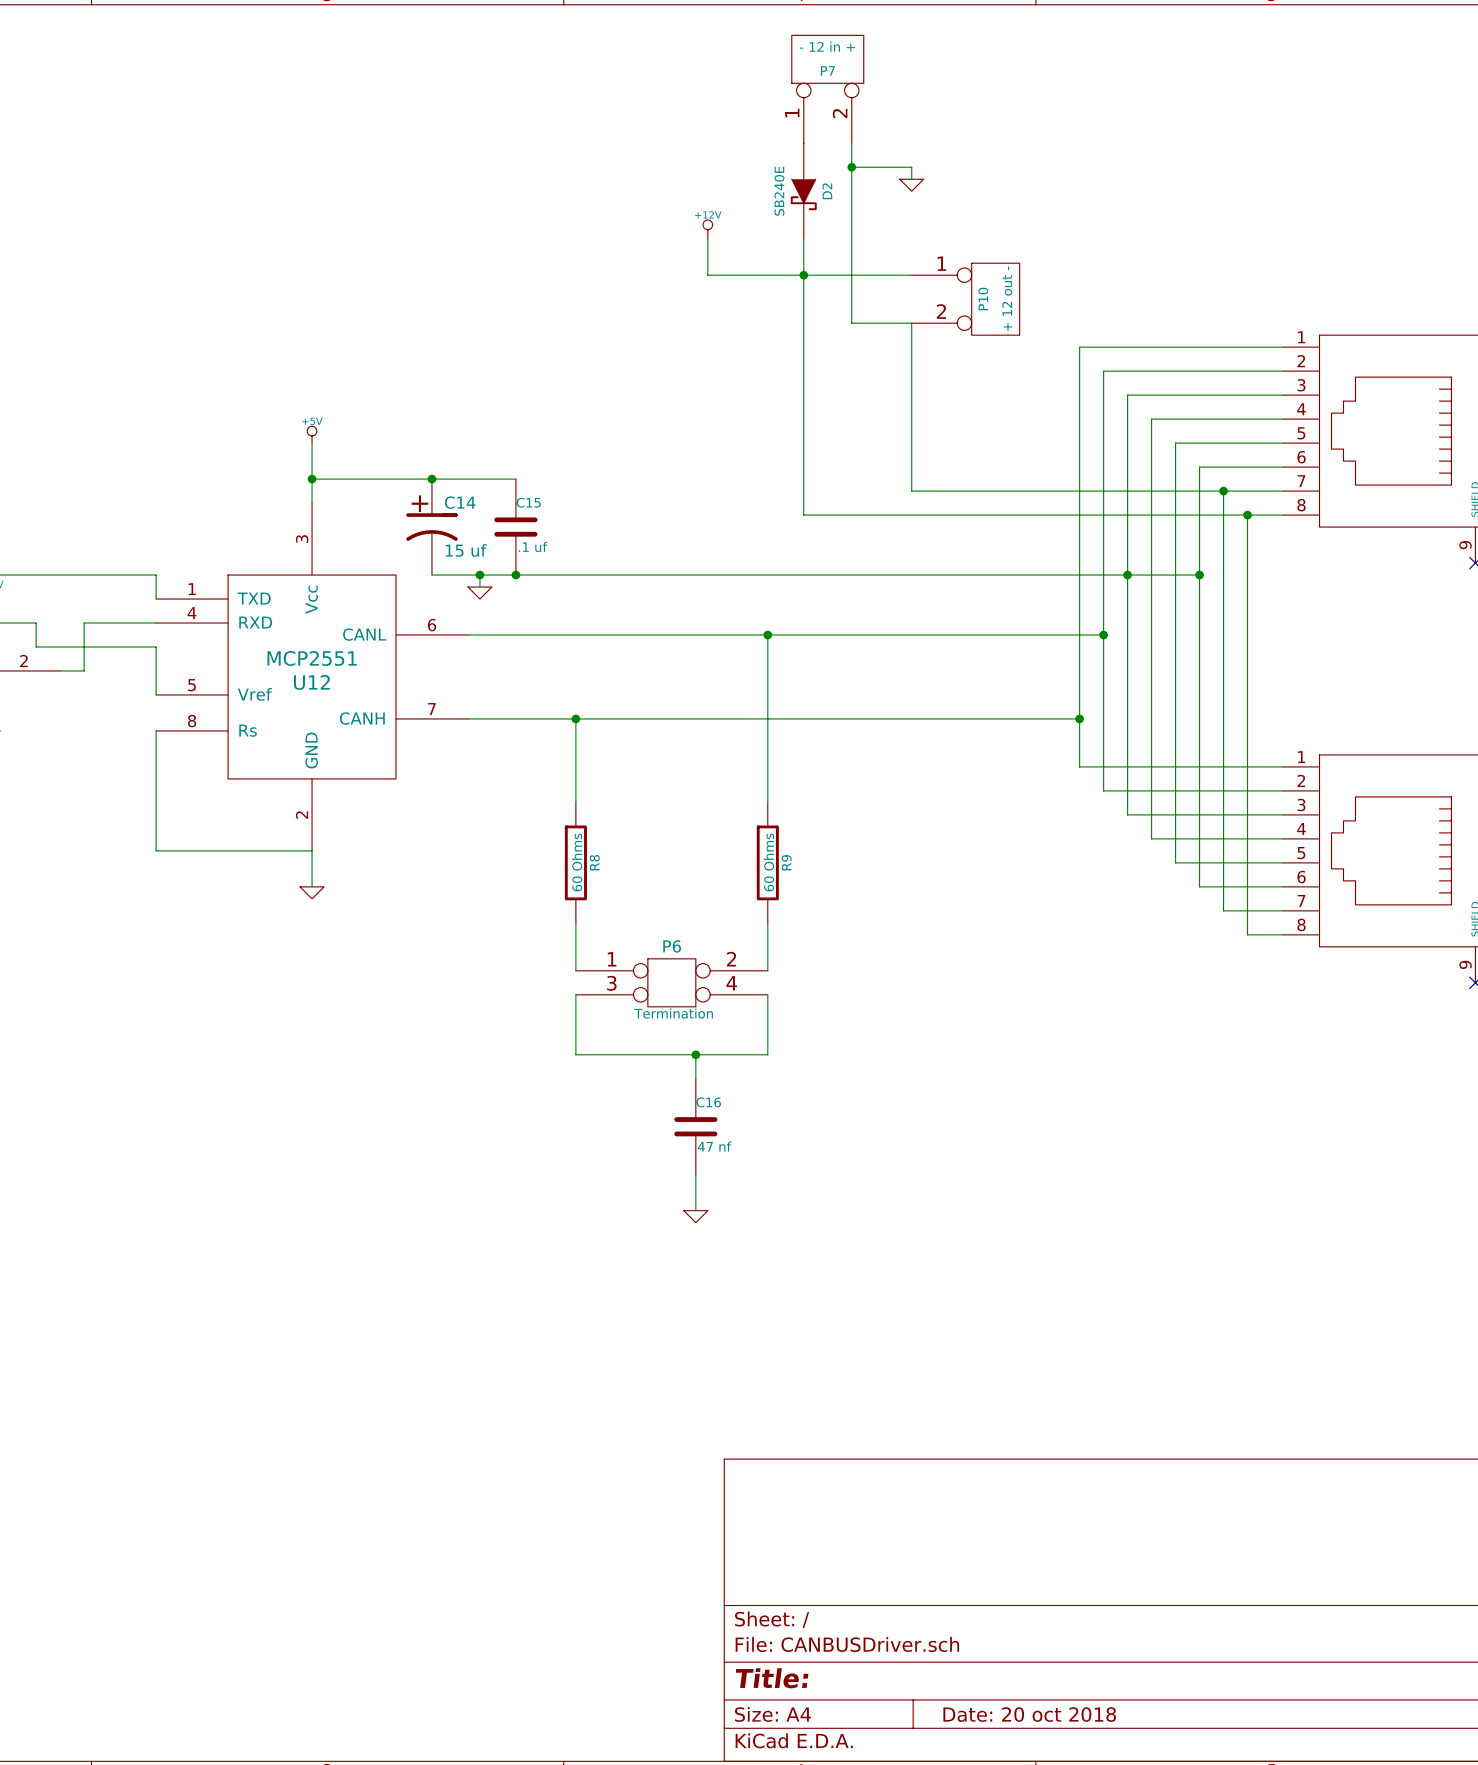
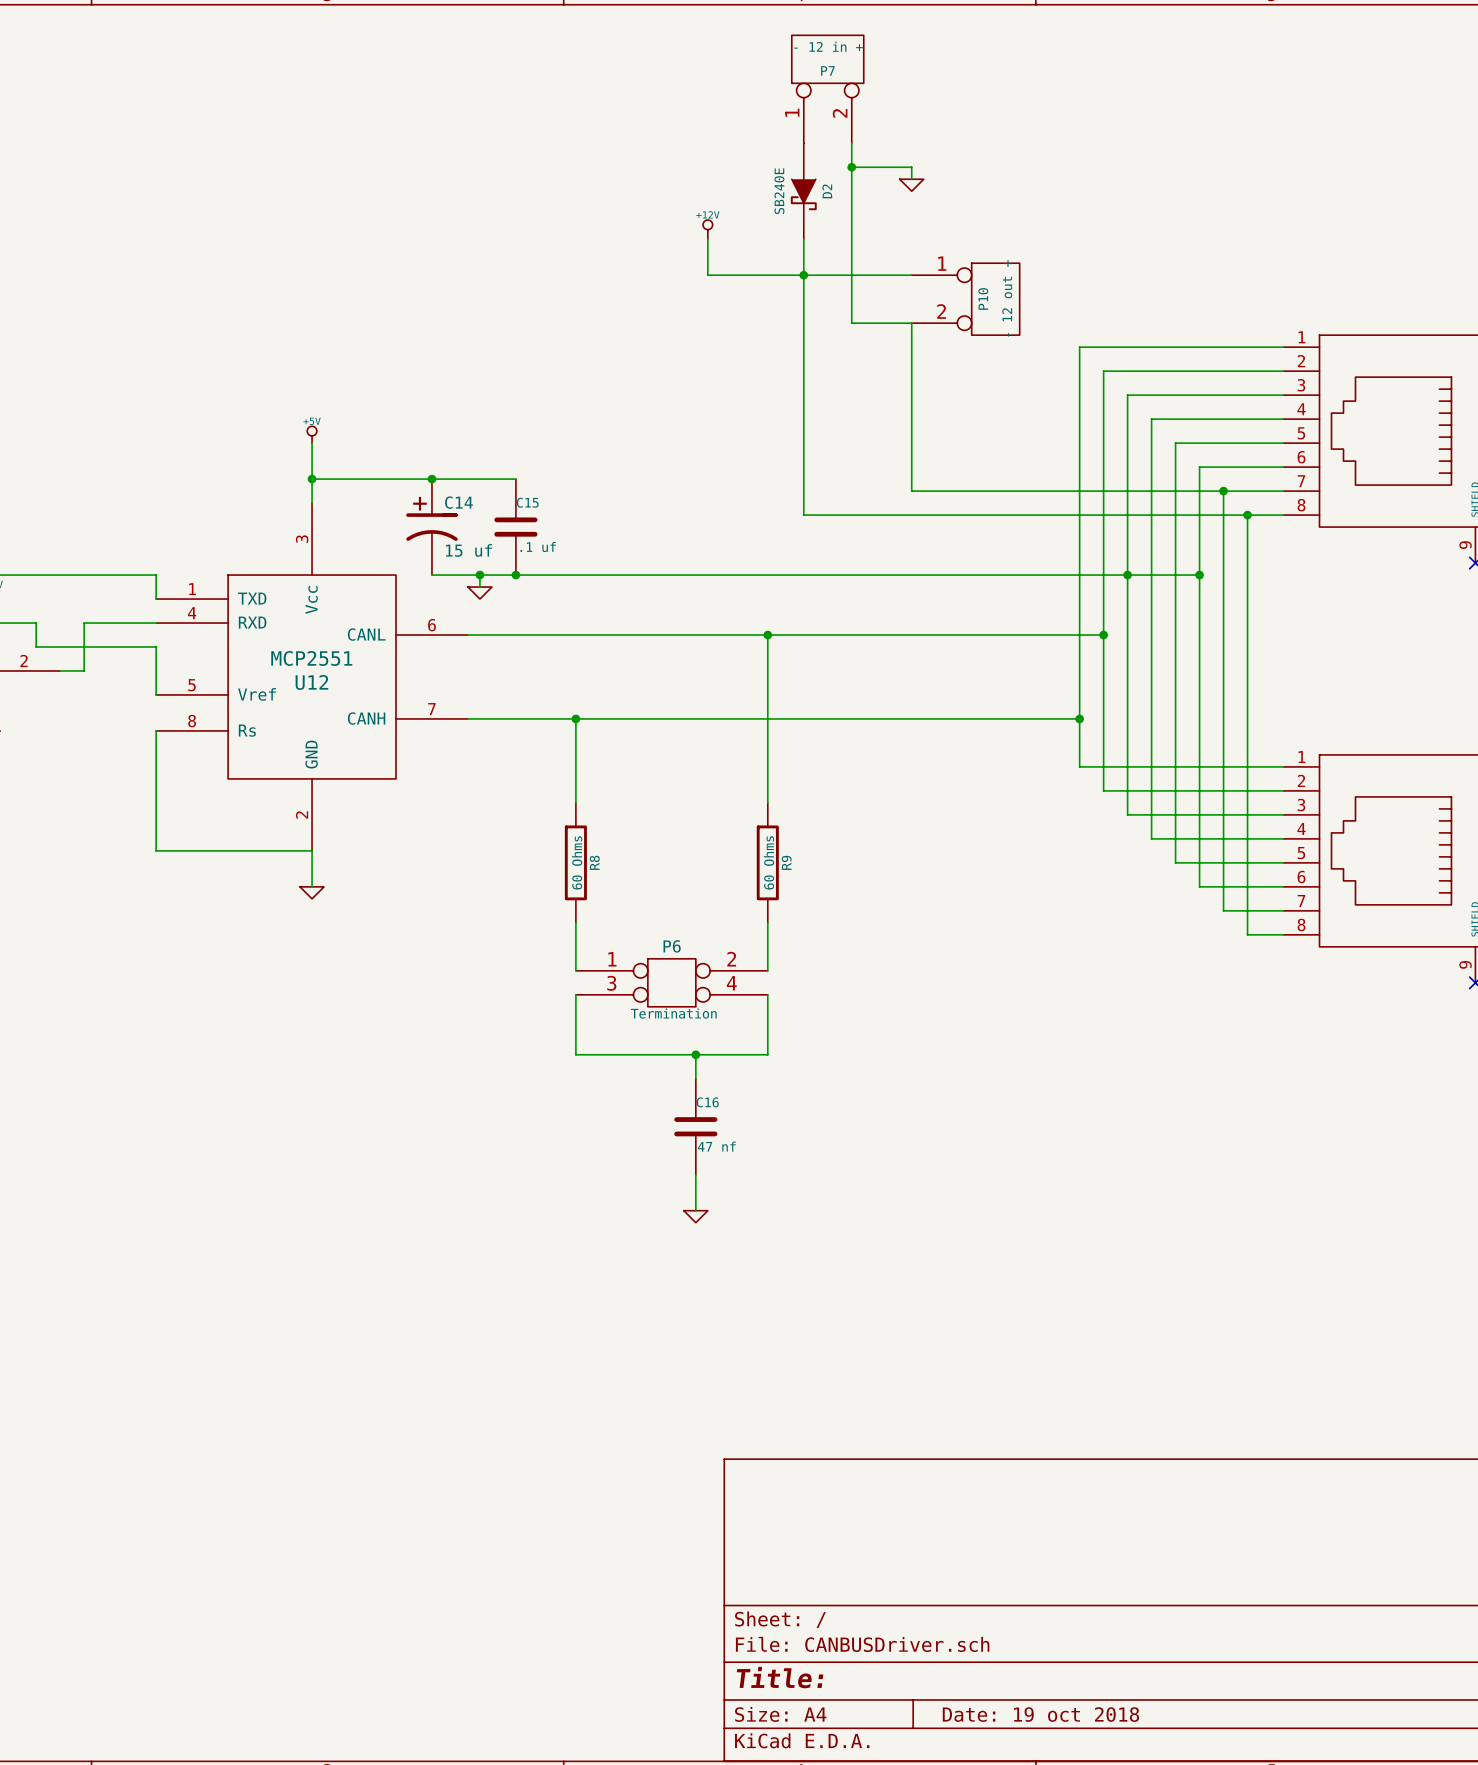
P10 value: + 12 out - (1007, 298) -> - 12 out + (1007, 298)
title block: Date: 20 oct 2018 (1029, 1714) -> Date: 19 oct 2018 (1040, 1714)

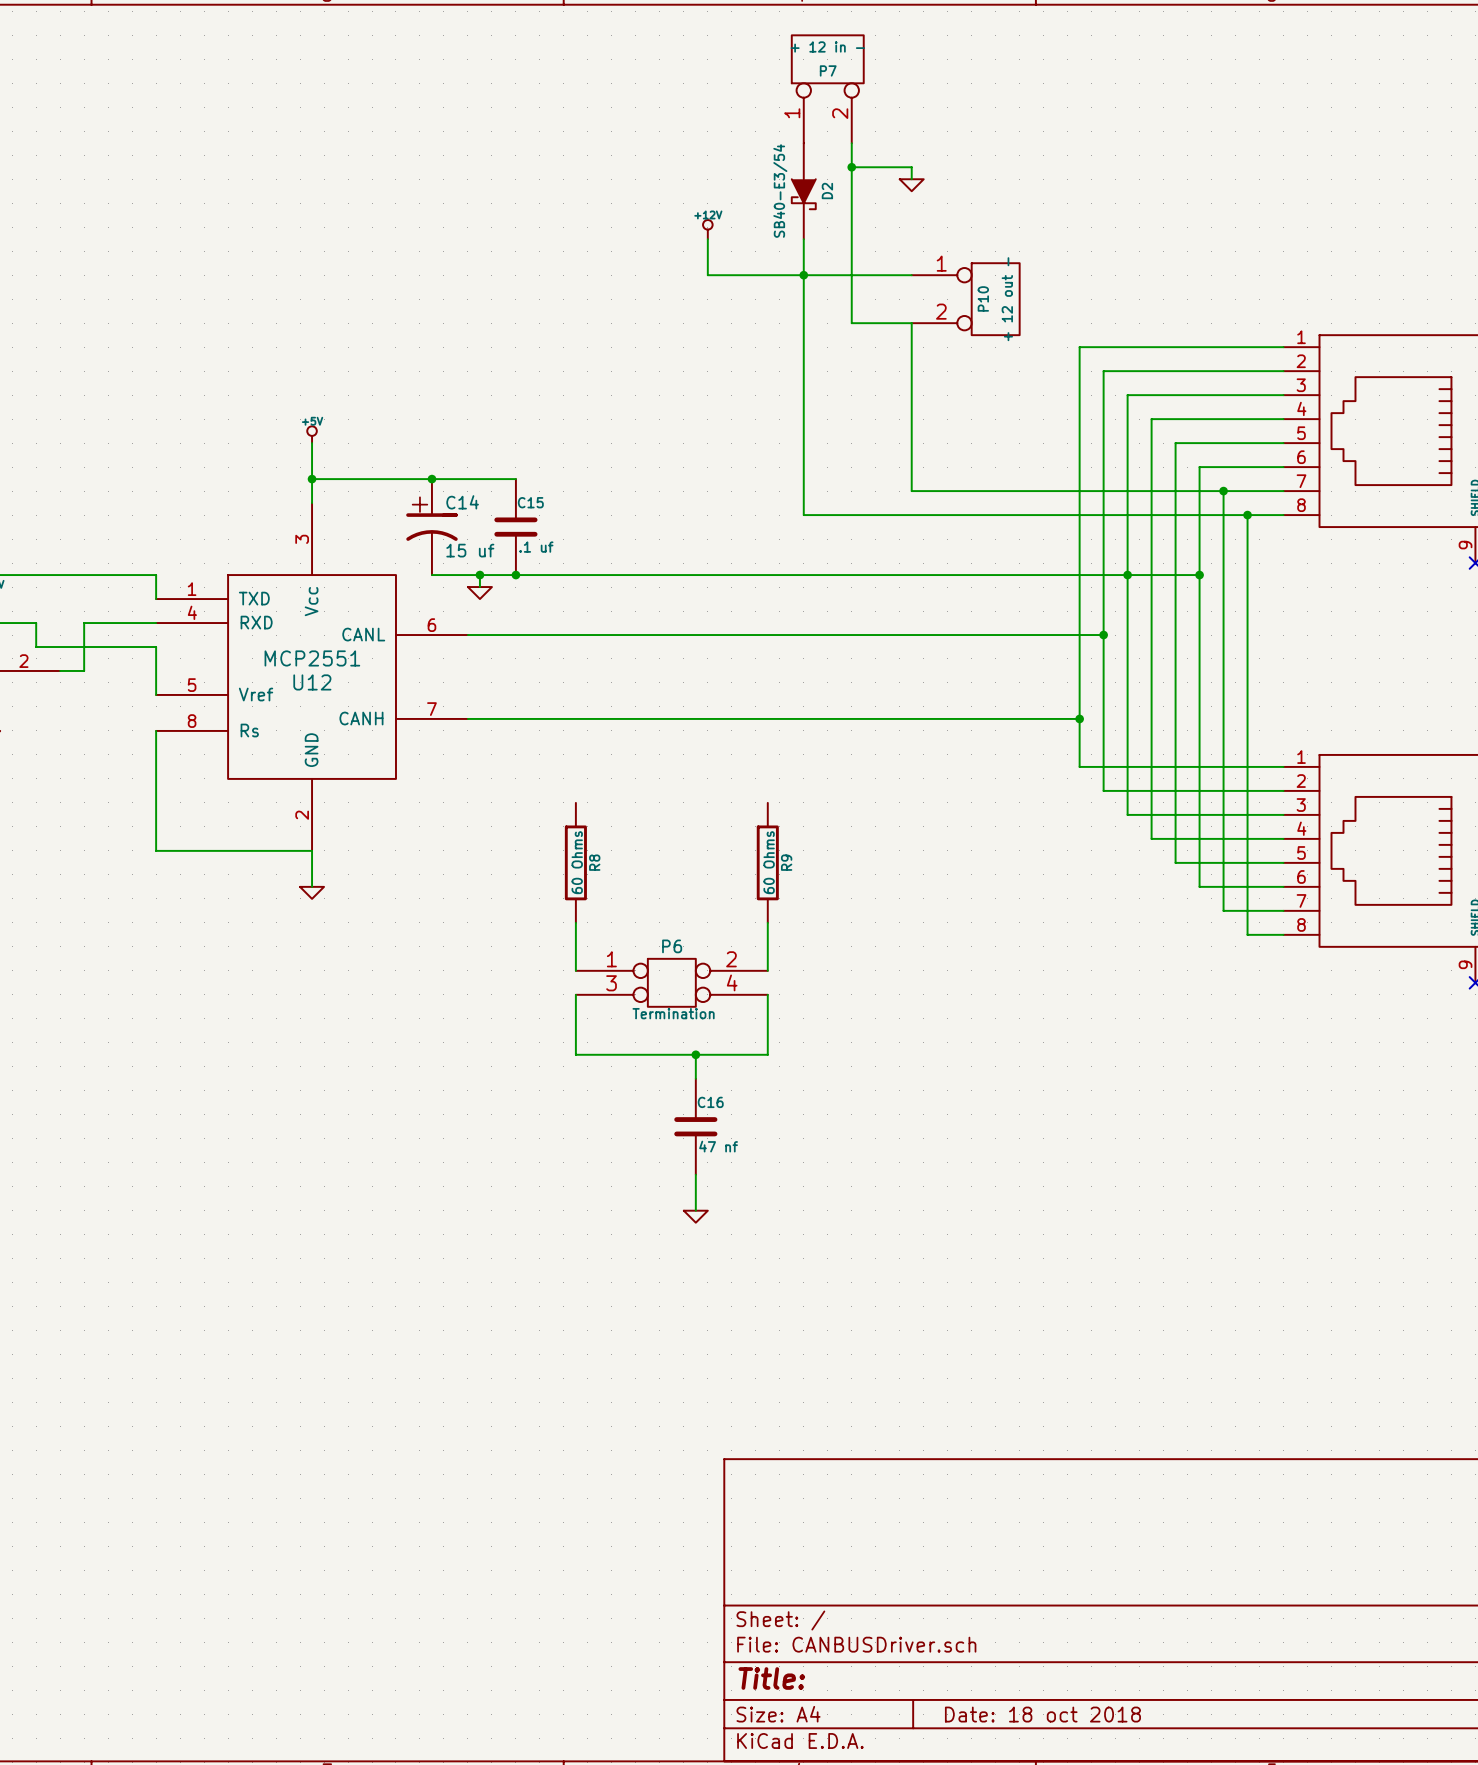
P7 value: - 12 in + (828, 46) -> + 12 in - (827, 46)
D2 value: SB240E (779, 191) -> SB40-E3/54 (780, 191)
P10 value: - 12 out + (1007, 298) -> + 12 out - (1007, 299)
wire: (767, 635) (767, 802) -> none
junction: (767, 635) -> none
wire: (575, 718) (575, 802) -> none
junction: (575, 718) -> none
title block: Date: 19 oct 2018 (1040, 1714) -> Date: 18 oct 2018 (1042, 1714)

